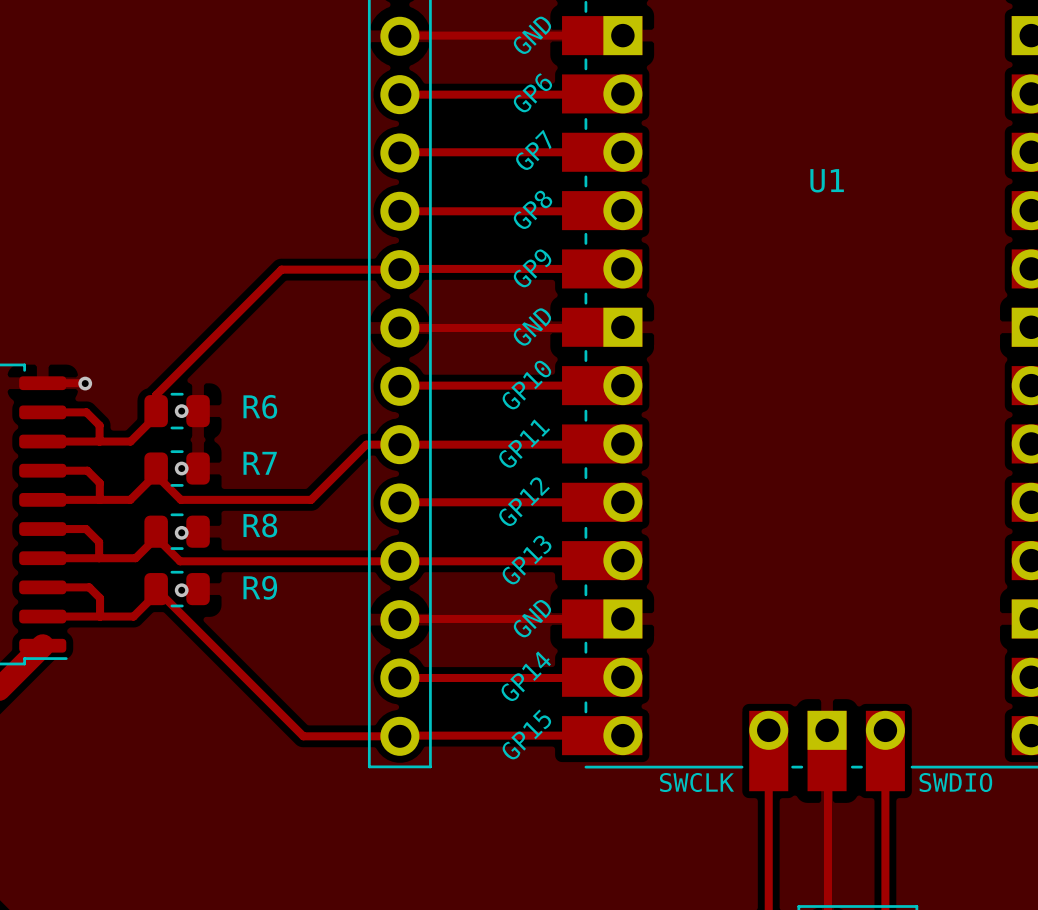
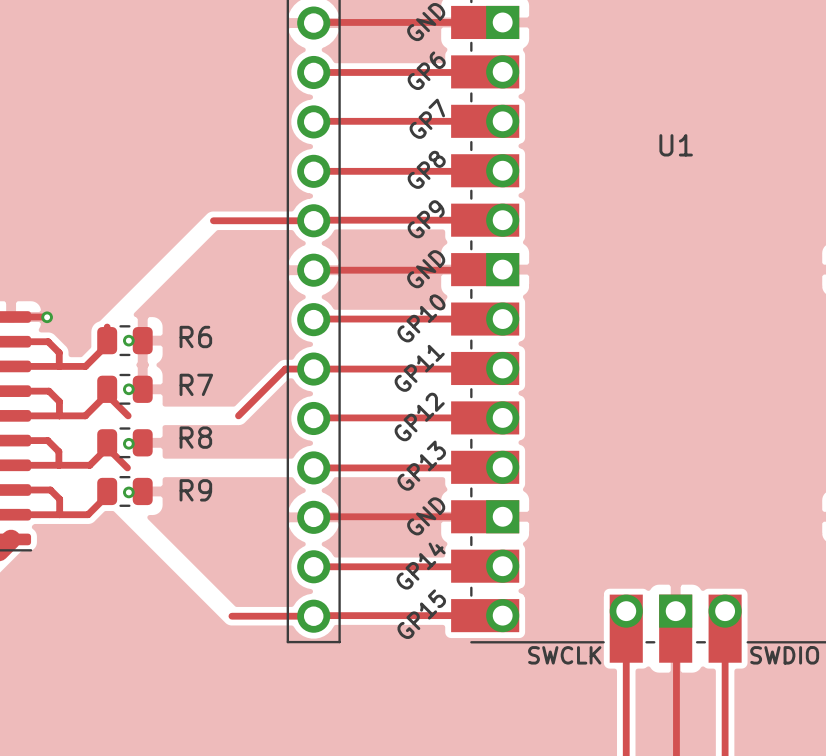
track: (281, 269) (156, 395) -> none
track: (180, 499) (311, 499) -> none
track: (180, 561) (399, 561) -> none
track: (156, 589) (303, 736) -> none

